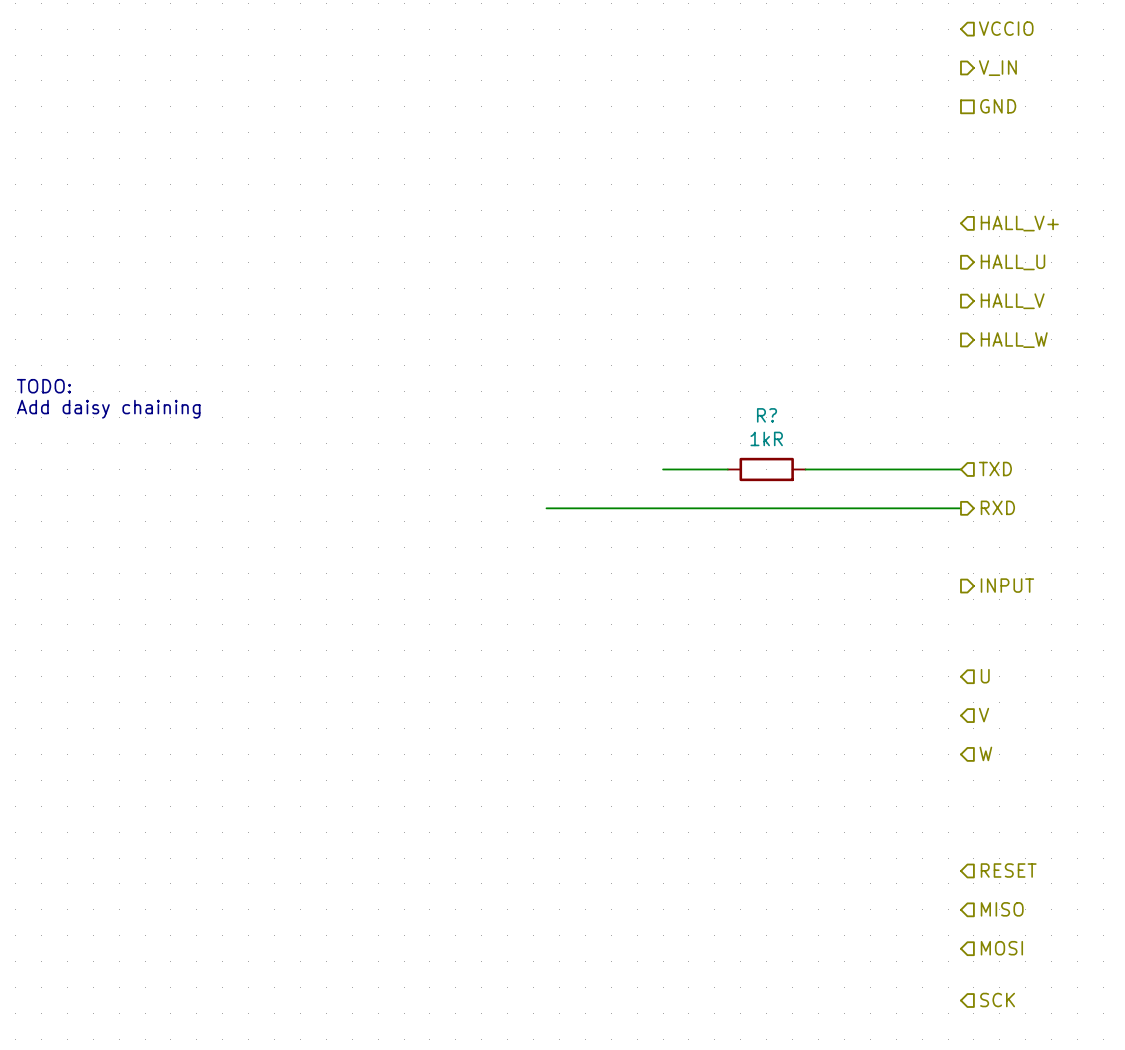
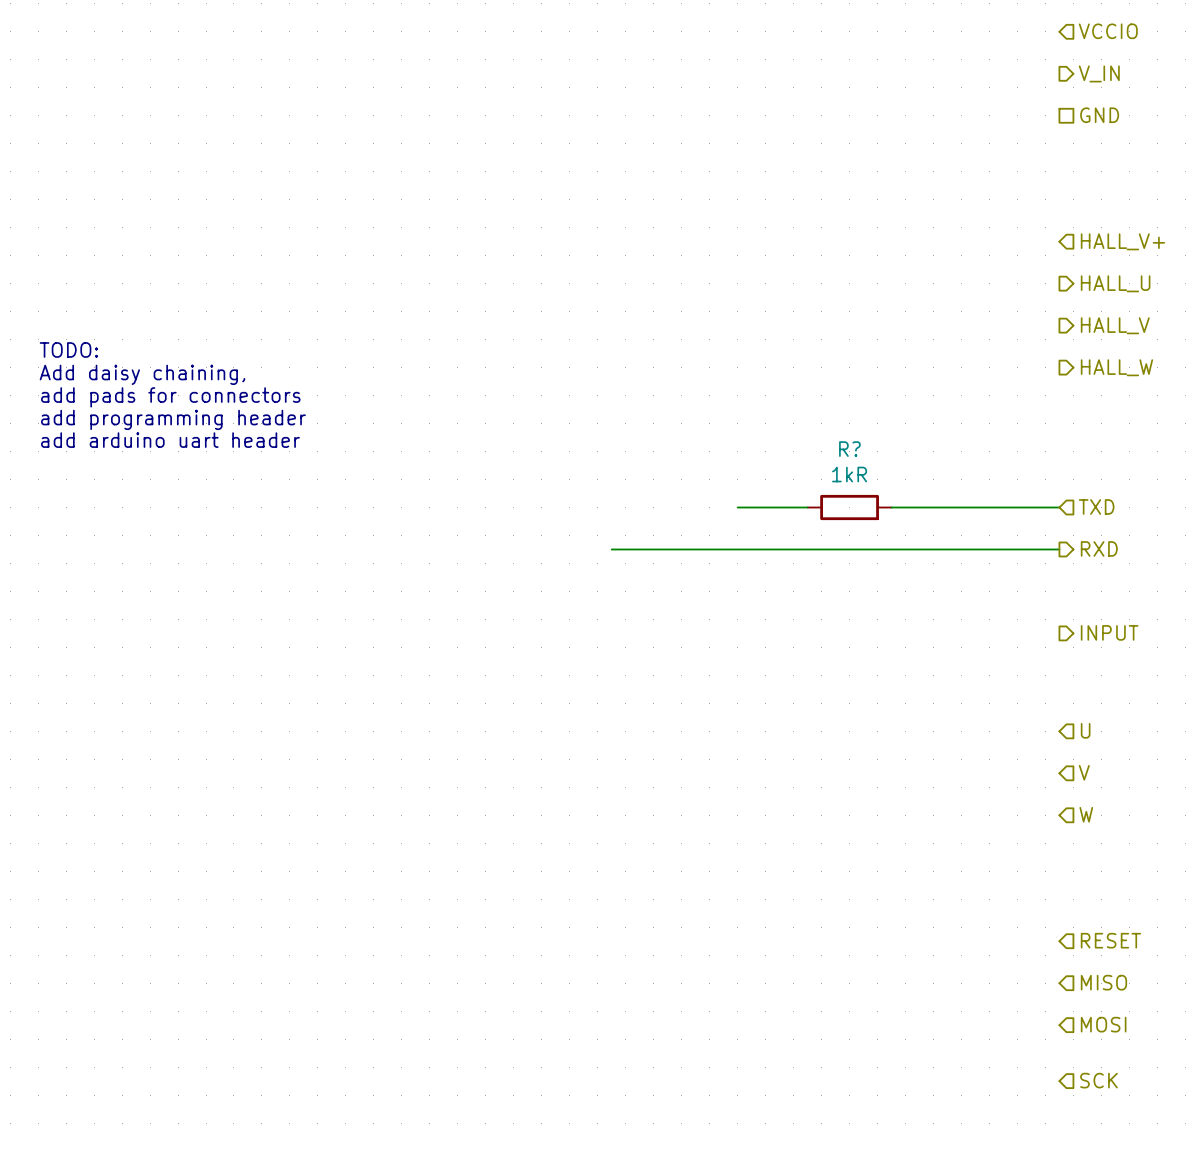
text: none -> TODO: (68, 349)
text: none -> Add daisy chaining, (142, 374)
text: none -> add pads for connectors (170, 397)
text: TODO: (43, 386) -> add programming header (173, 419)
text: Add daisy chaining (108, 409) -> add arduino uart header (170, 440)

